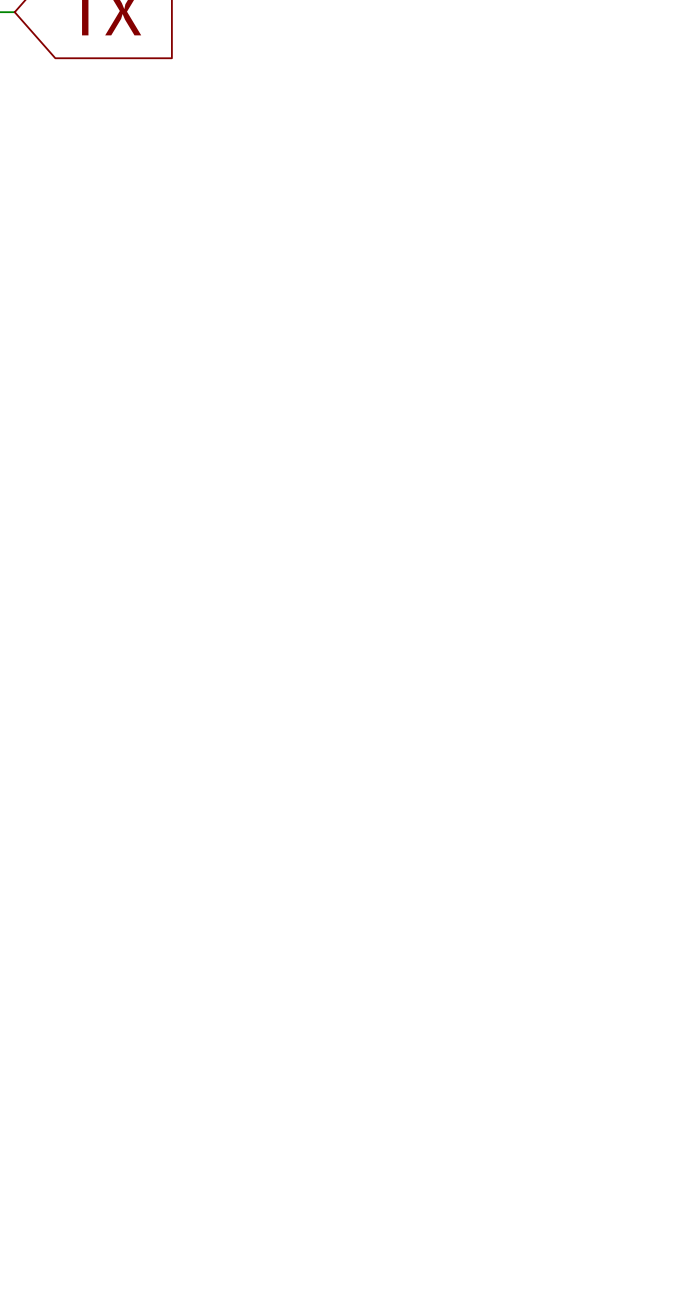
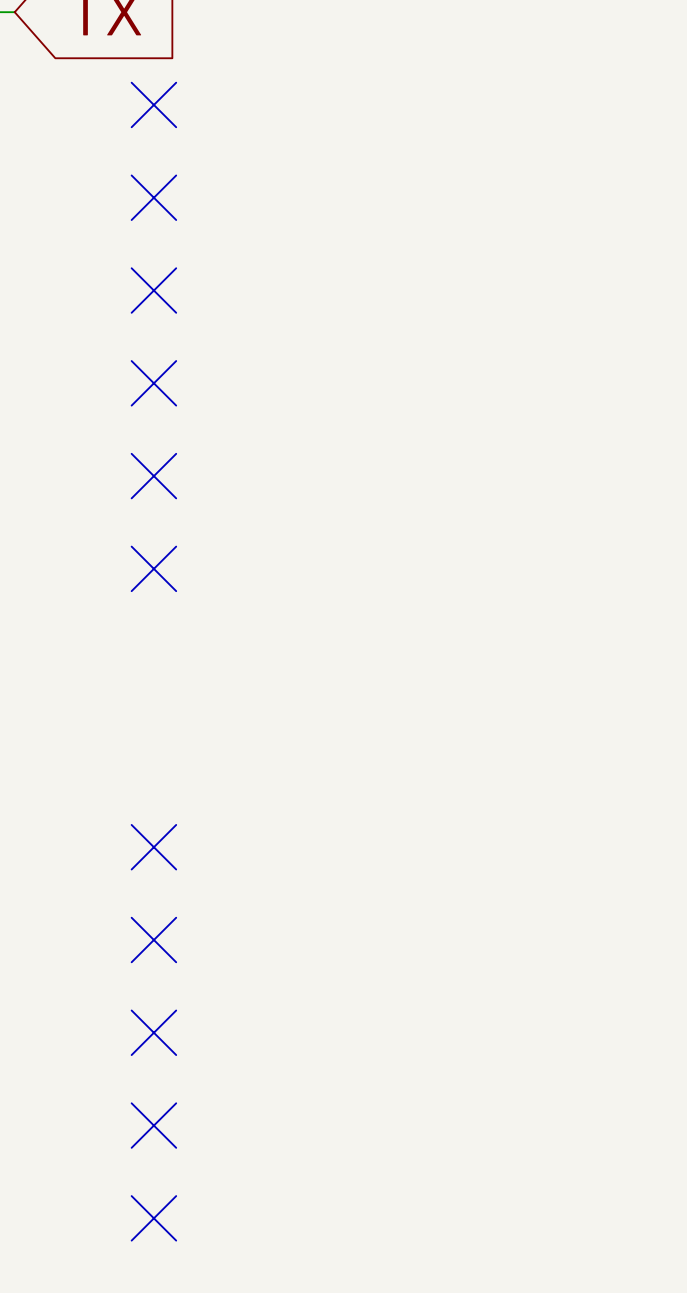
no-connect mark: none -> (153, 104)
no-connect mark: none -> (153, 197)
no-connect mark: none -> (153, 290)
no-connect mark: none -> (153, 383)
no-connect mark: none -> (153, 476)
no-connect mark: none -> (153, 568)
no-connect mark: none -> (153, 847)
no-connect mark: none -> (153, 940)
no-connect mark: none -> (153, 1032)
no-connect mark: none -> (153, 1125)
no-connect mark: none -> (153, 1218)

